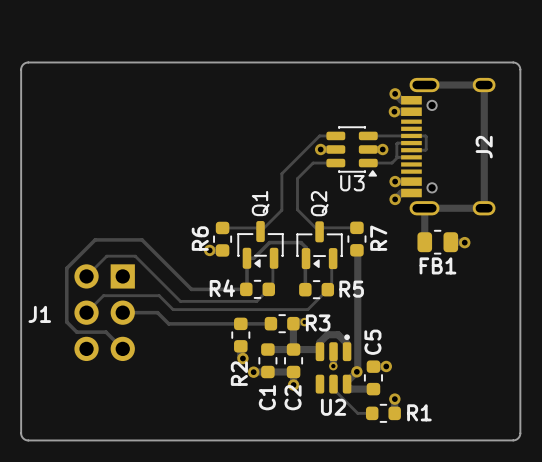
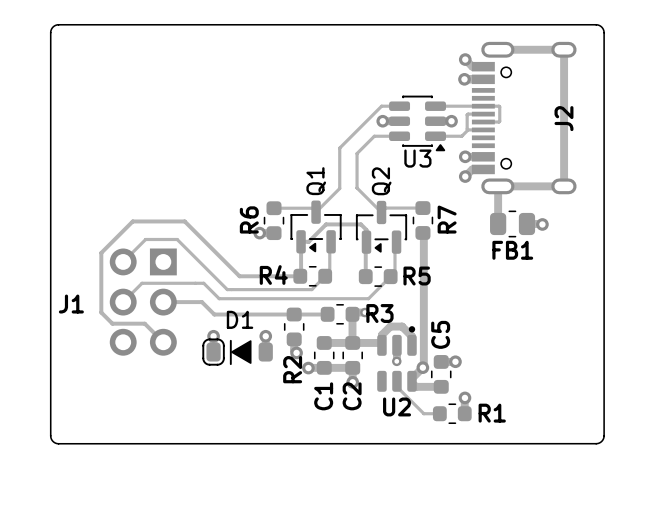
via: none -> (213, 336)
via: none -> (265, 336)
D1: none -> (237, 352)

